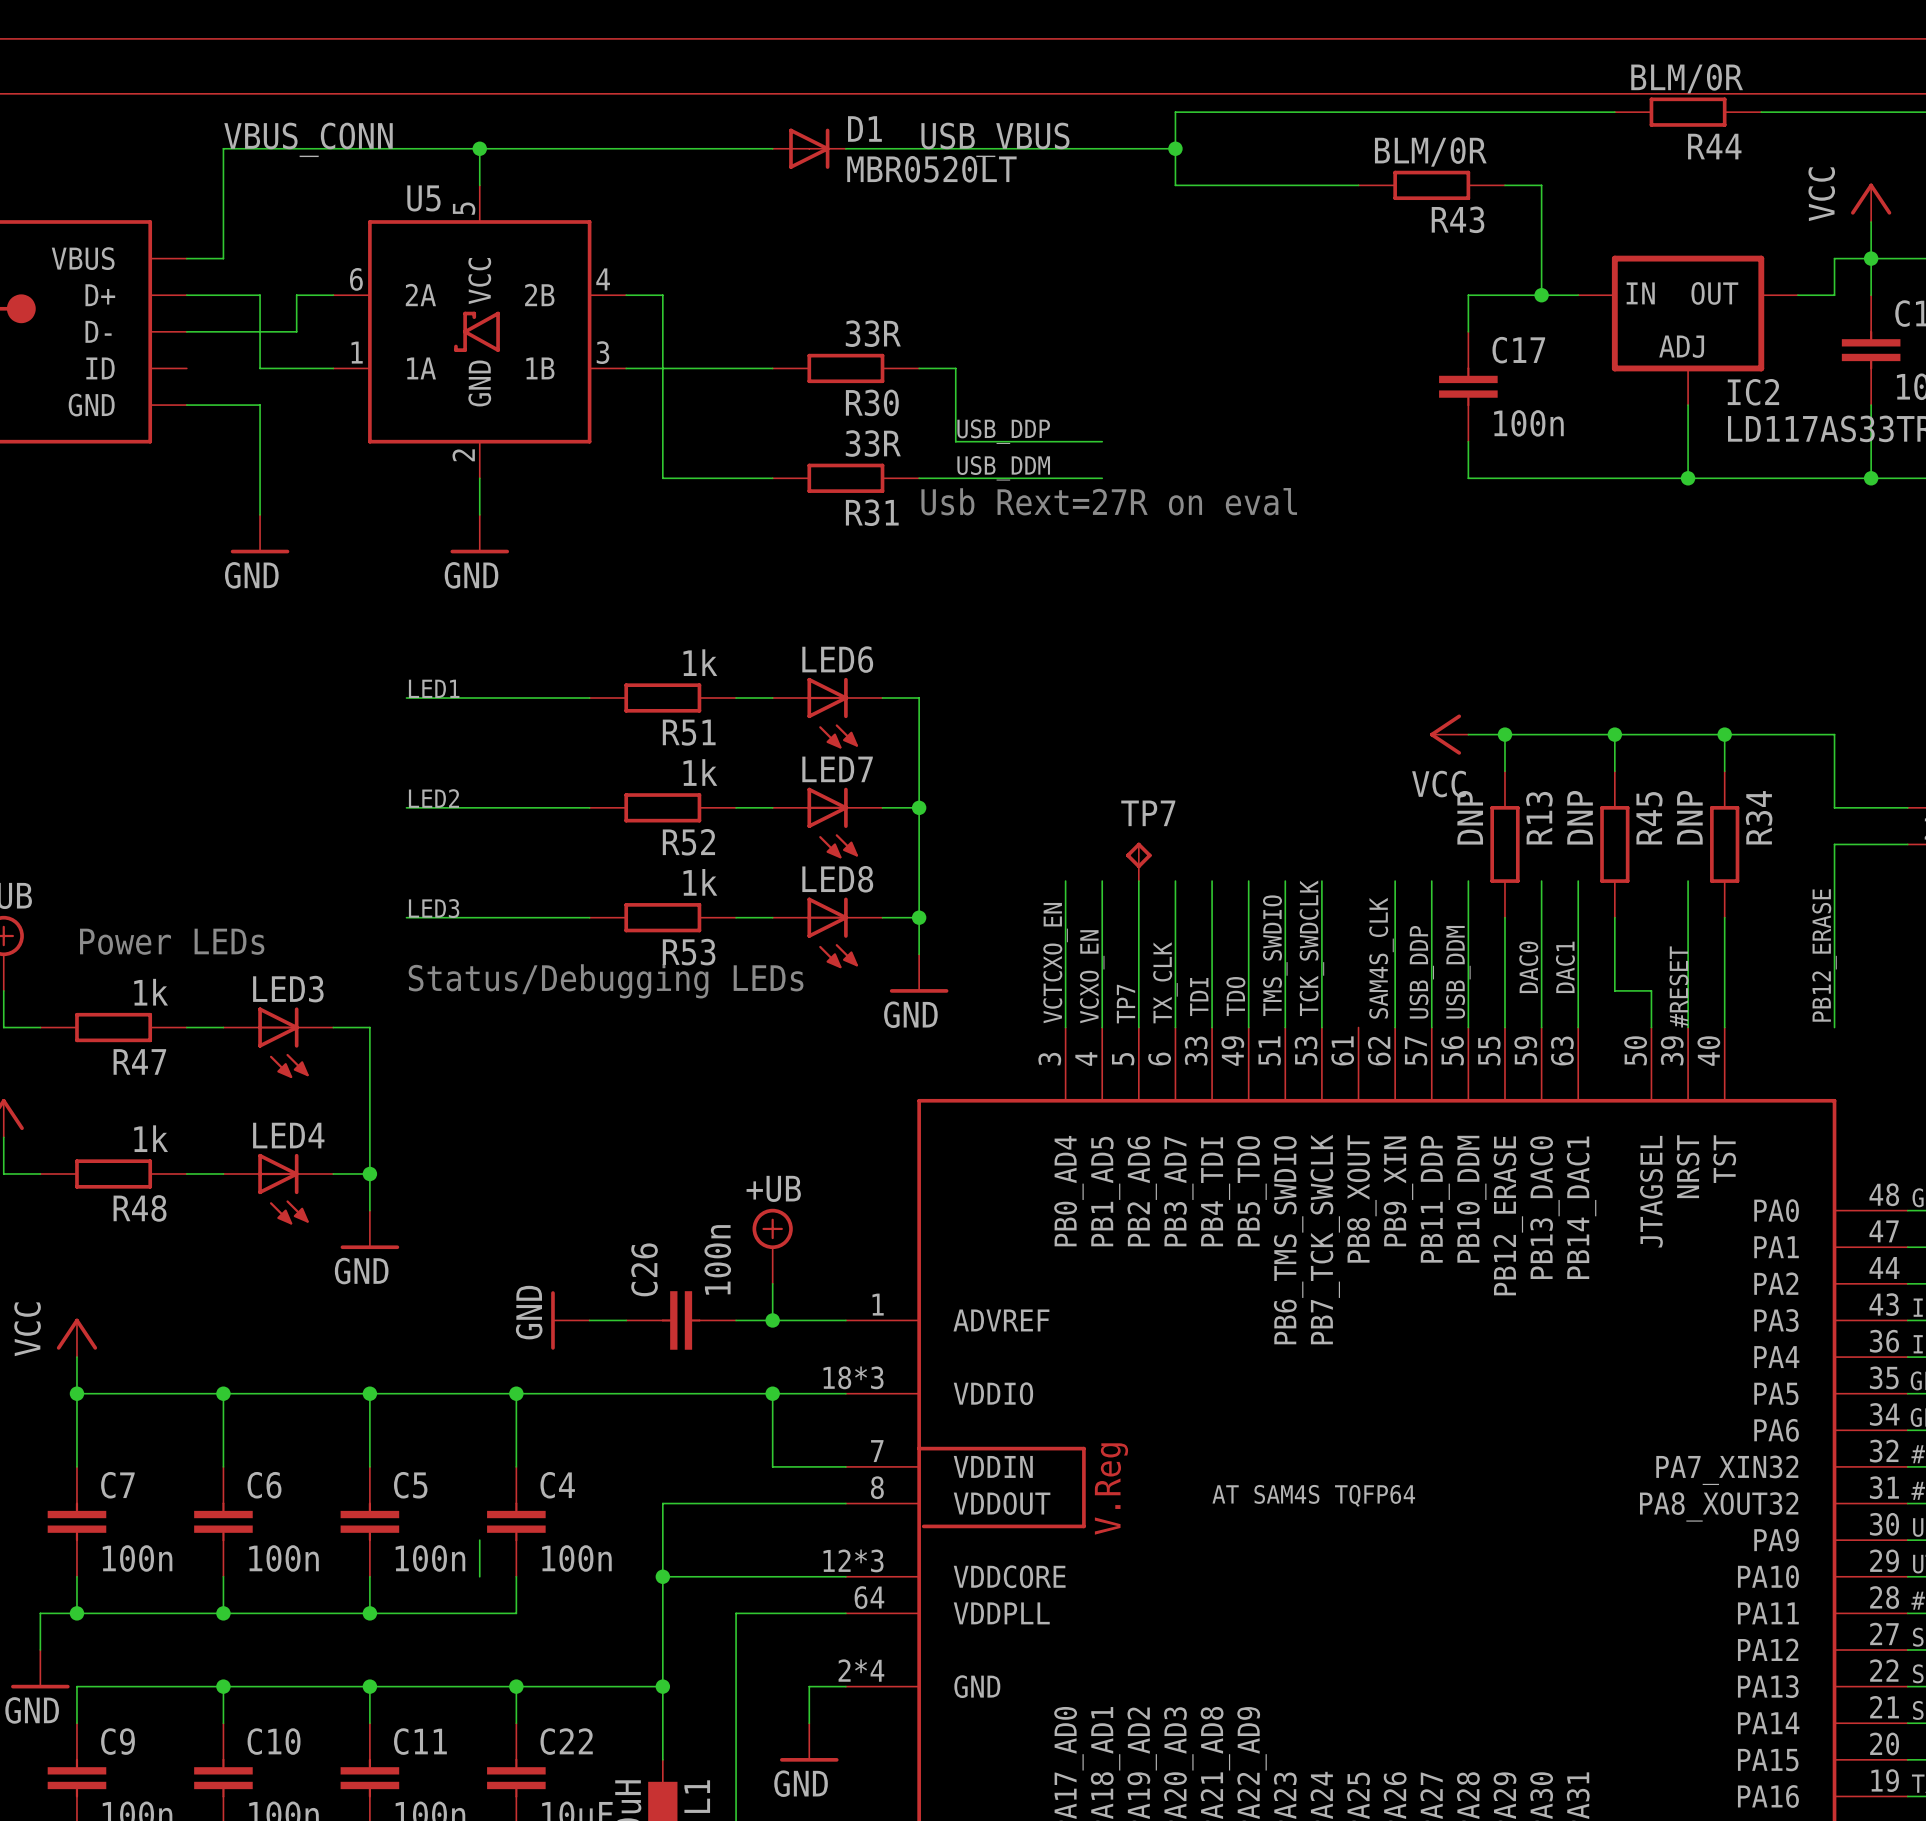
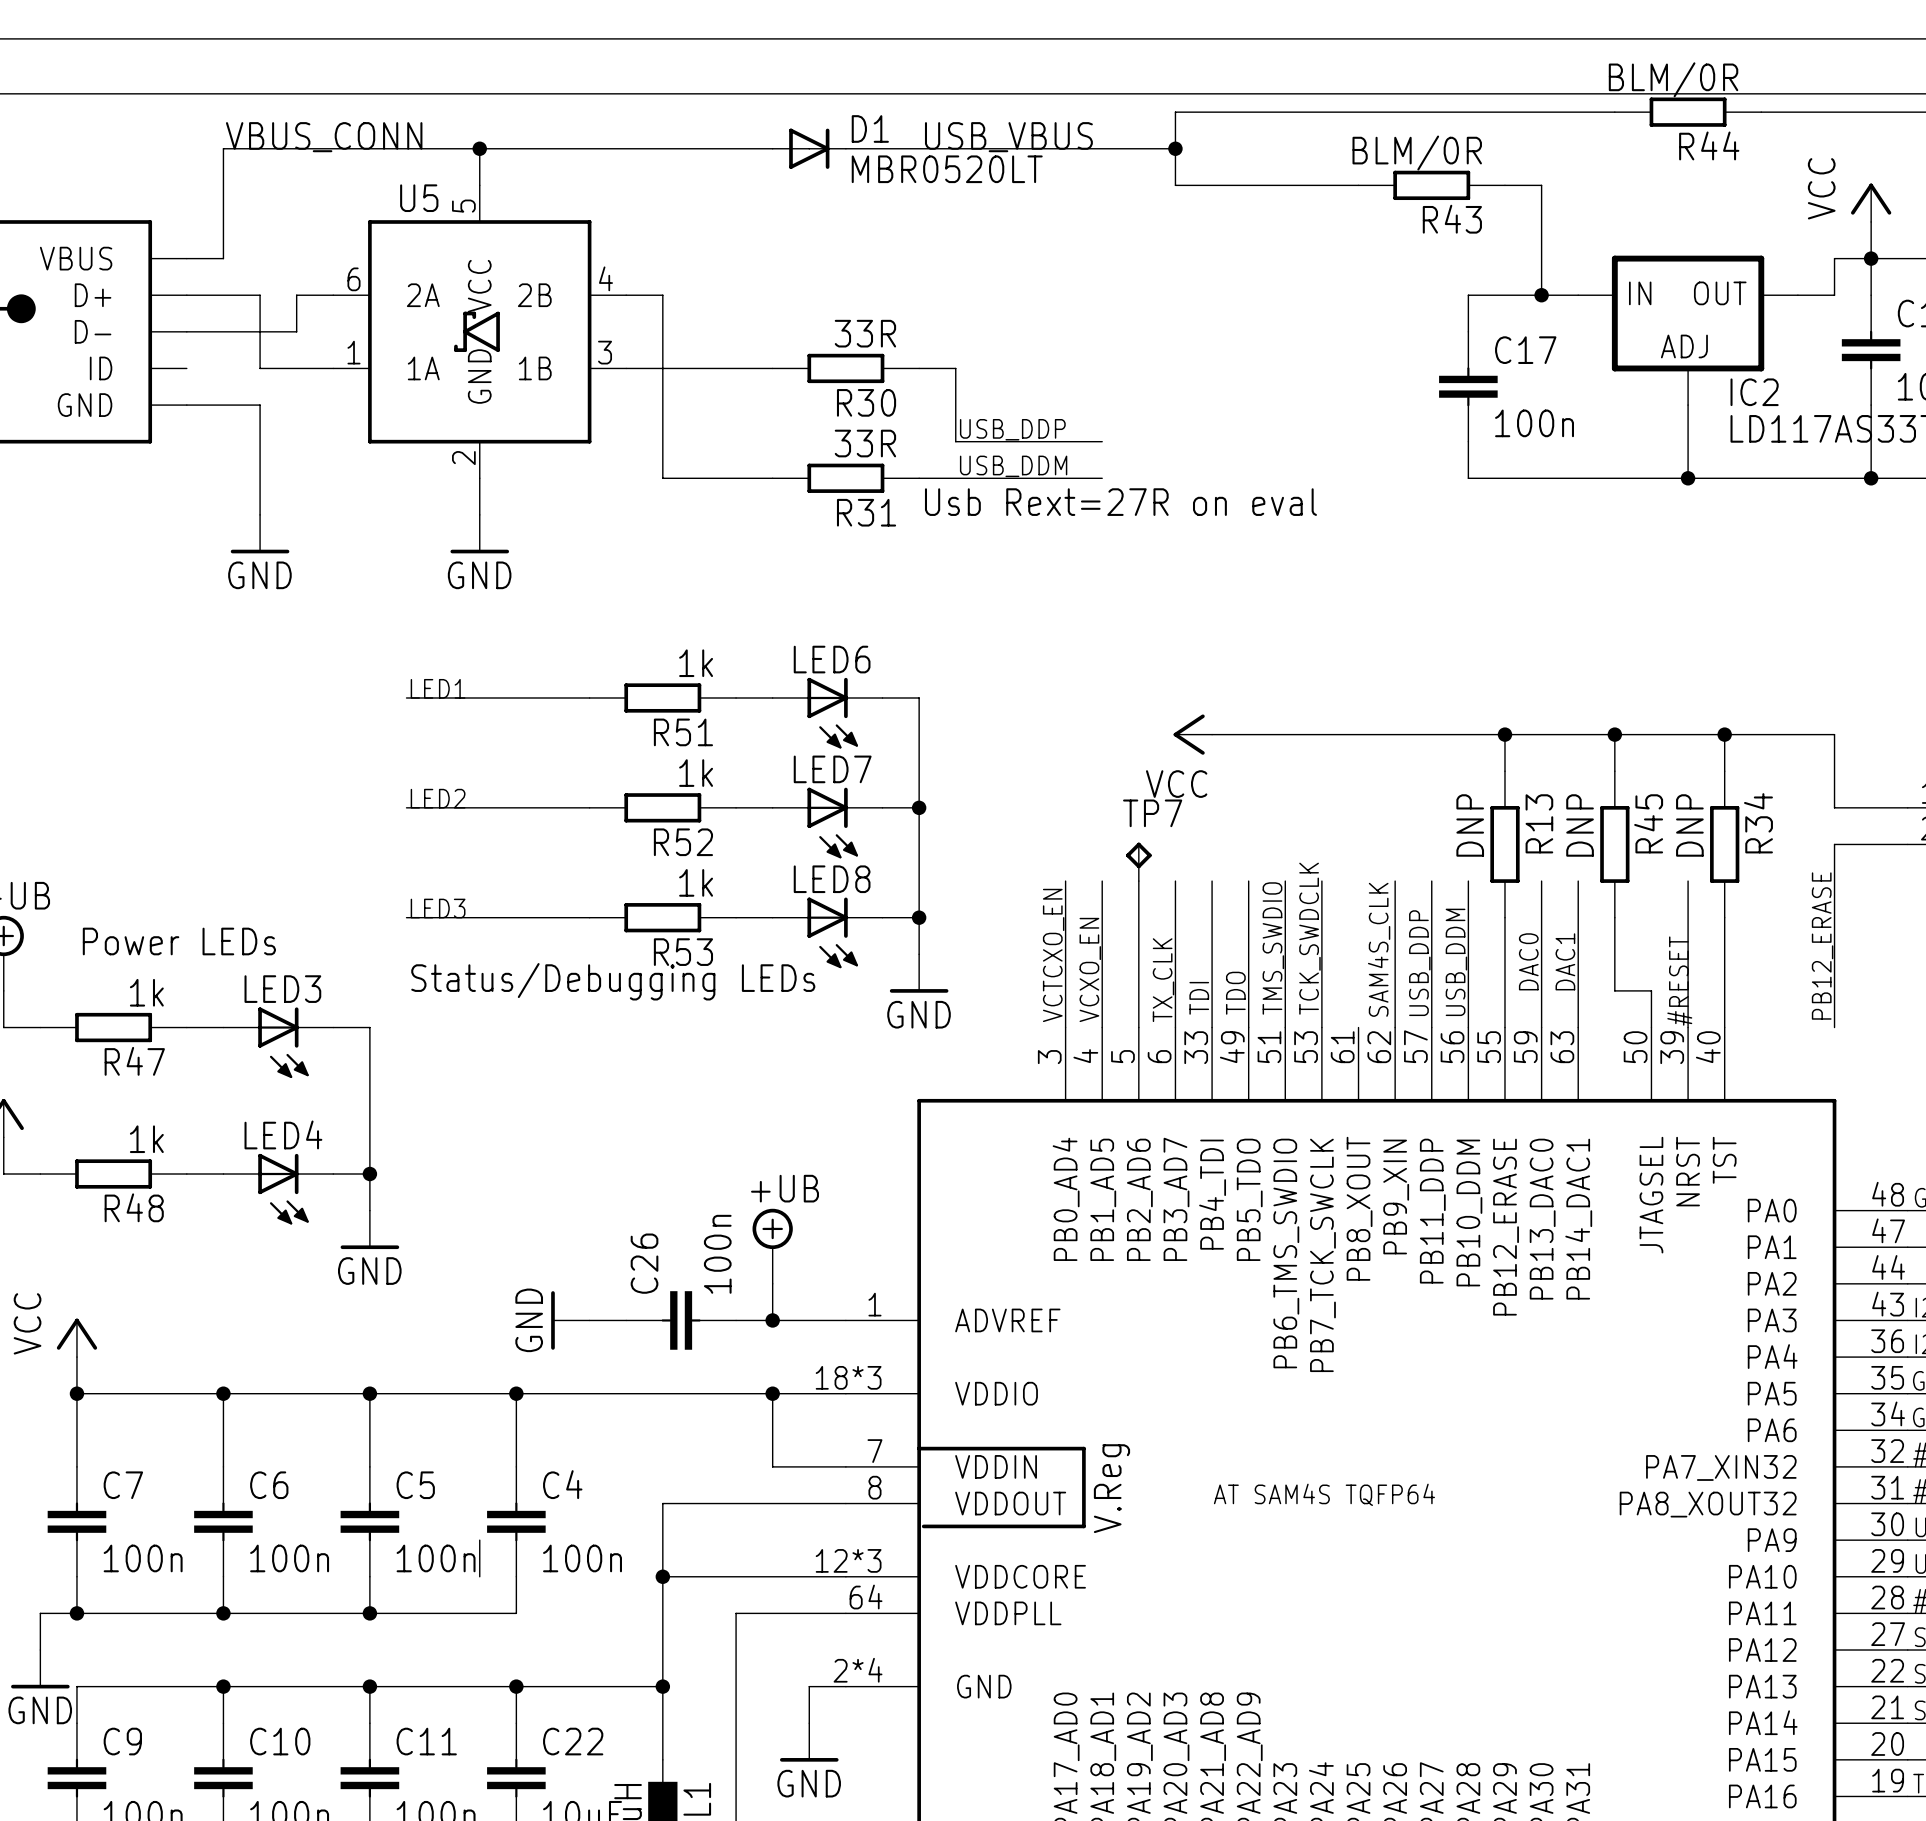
wire: none -> (1212, 734) (1468, 734)
power symbol position: VCC (1449, 734) -> VCC (1192, 734)
label: TP7 (1126, 1004) -> none

